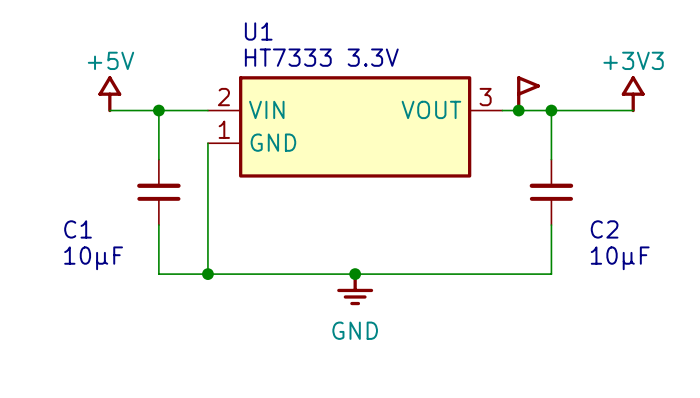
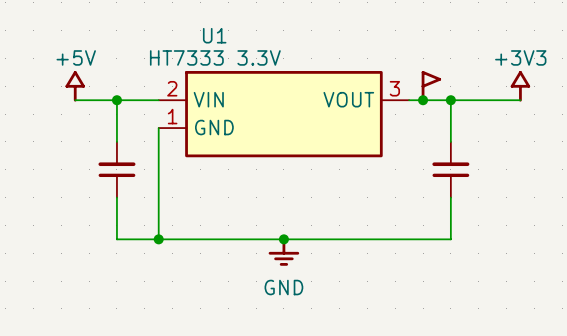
text: U1 (258, 31) -> none
U1 name: none -> U1 (214, 35)
text: HT7333 3.3V (321, 57) -> none
U1 value: none -> HT7333 3.3V (215, 57)
text: C1 (78, 229) -> none
text: C2 (604, 229) -> none
text: 10µF (93, 258) -> none
text: 10µF (620, 258) -> none

